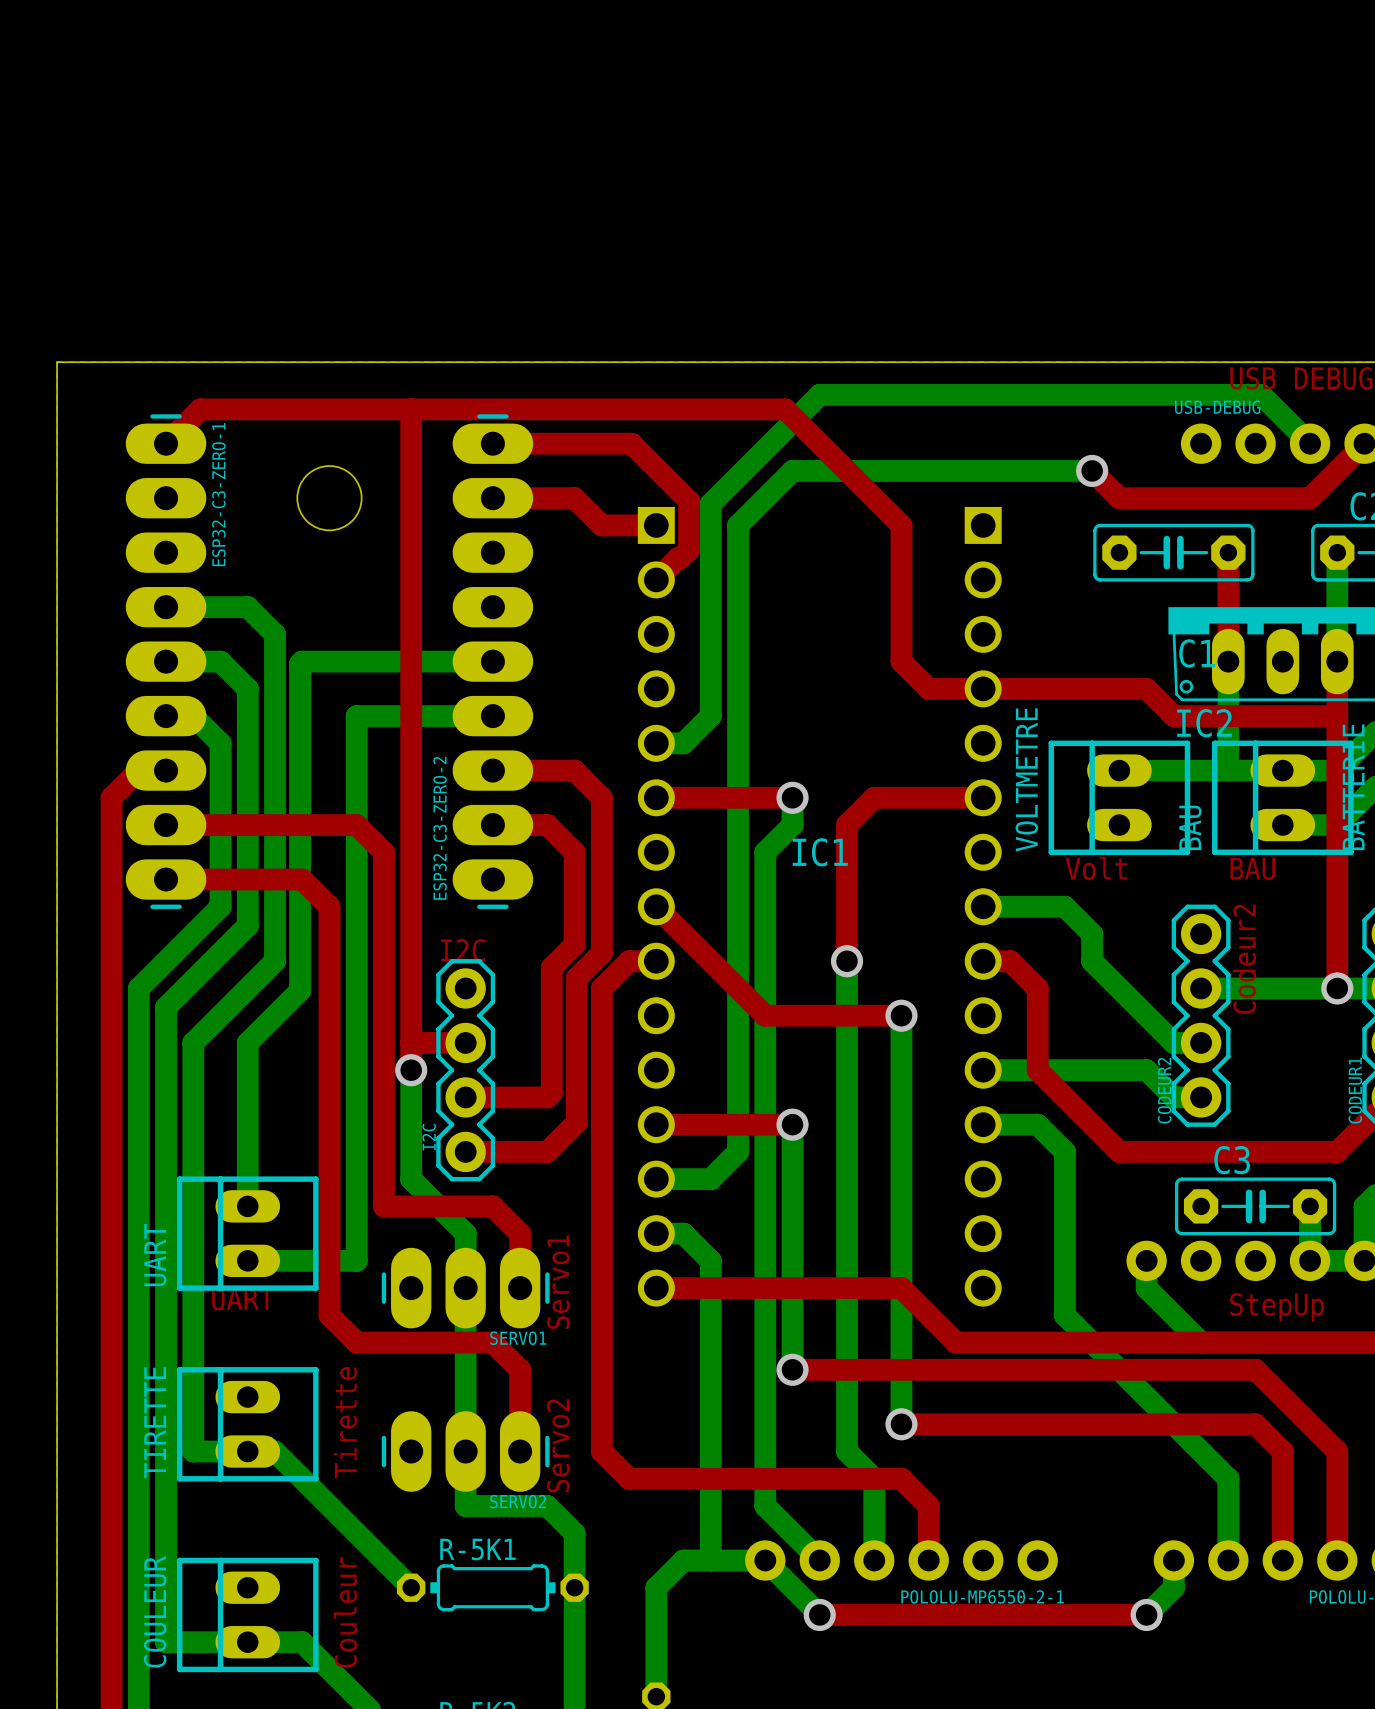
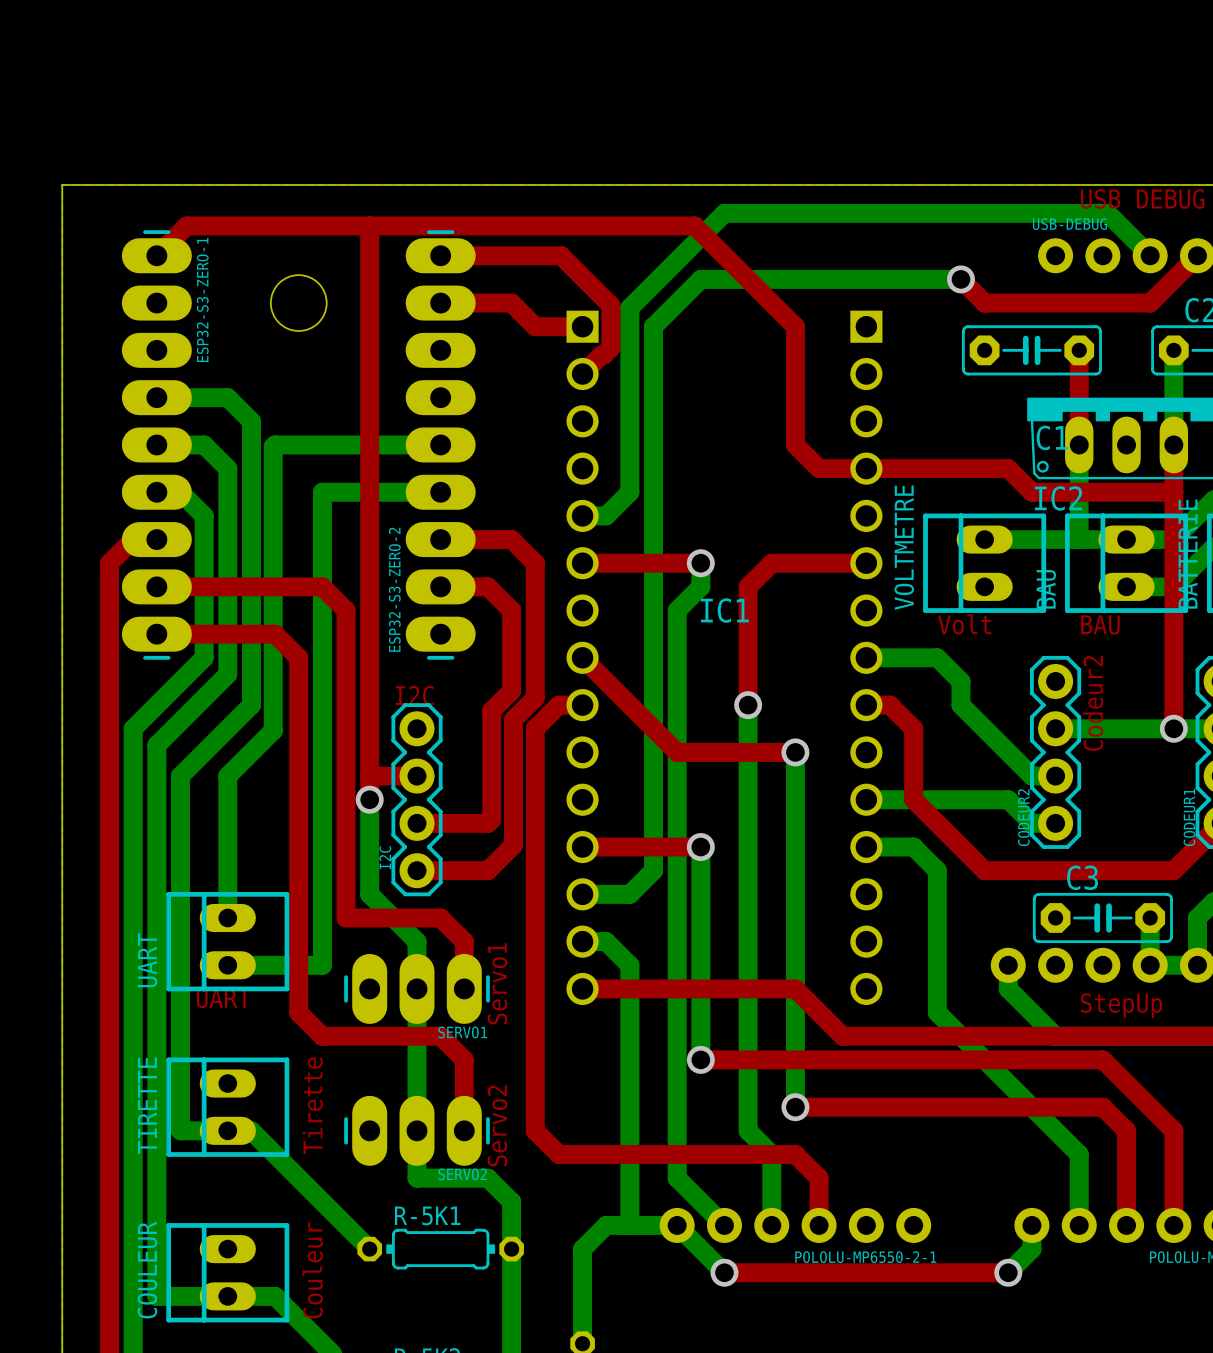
ESP32-C3-ZERO-1 name: ESP32-C3-ZERO-1 (218, 494) -> ESP32-S3-ZERO-1 (202, 299)
ESP32-C3-ZERO-2 name: ESP32-C3-ZERO-2 (440, 828) -> ESP32-S3-ZERO-2 (394, 589)

